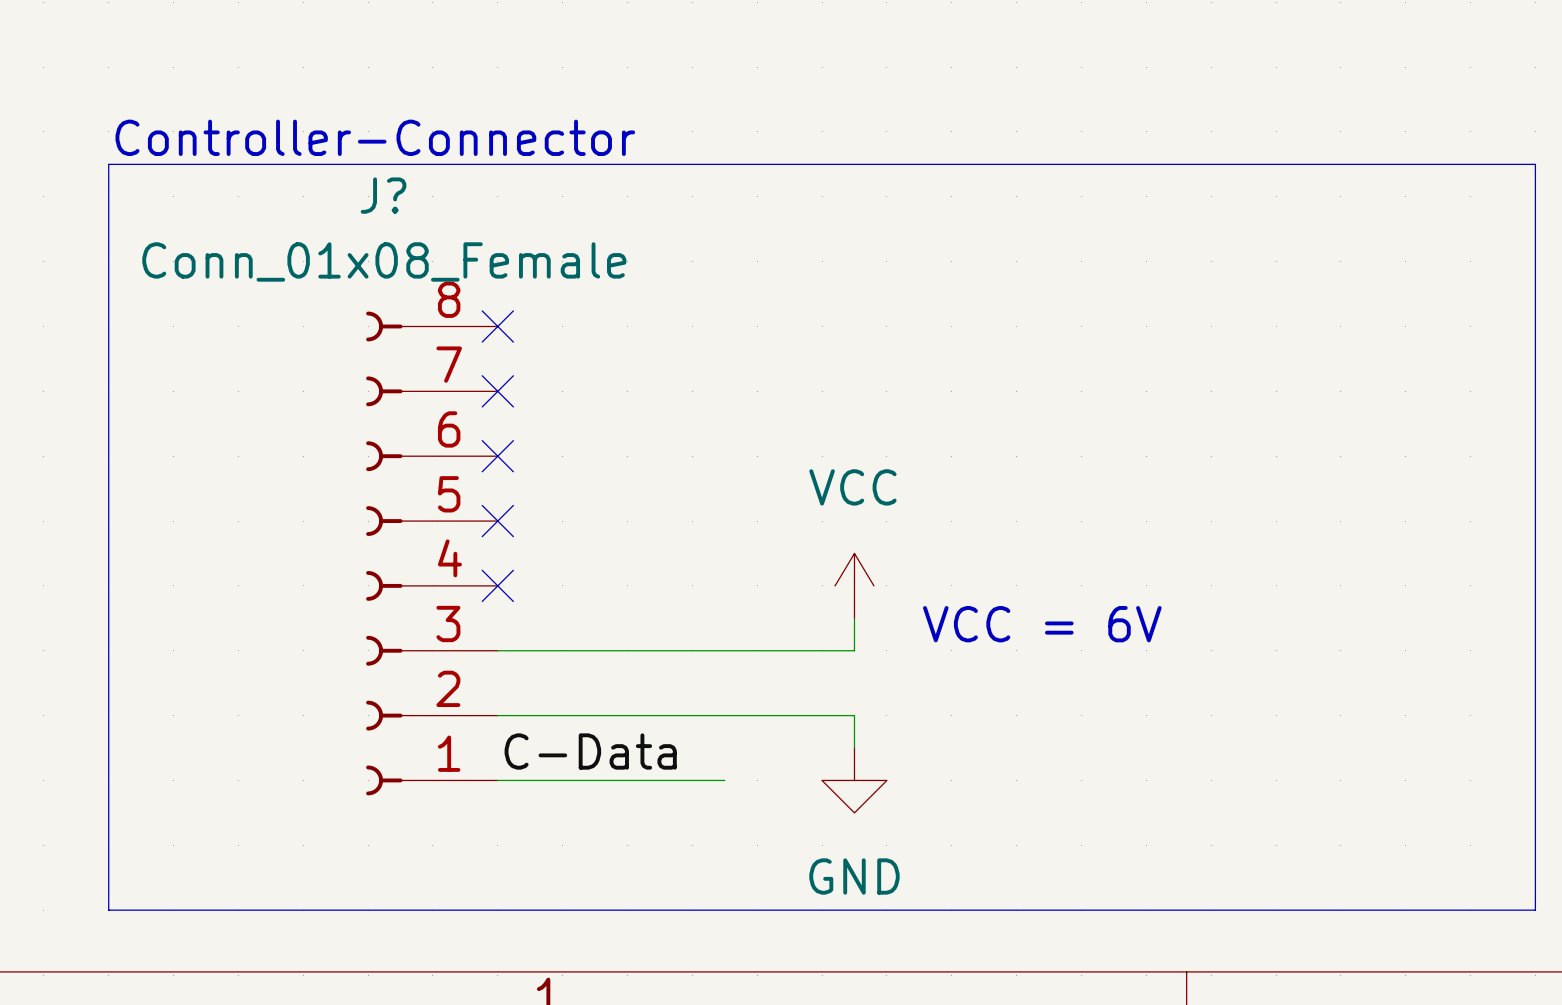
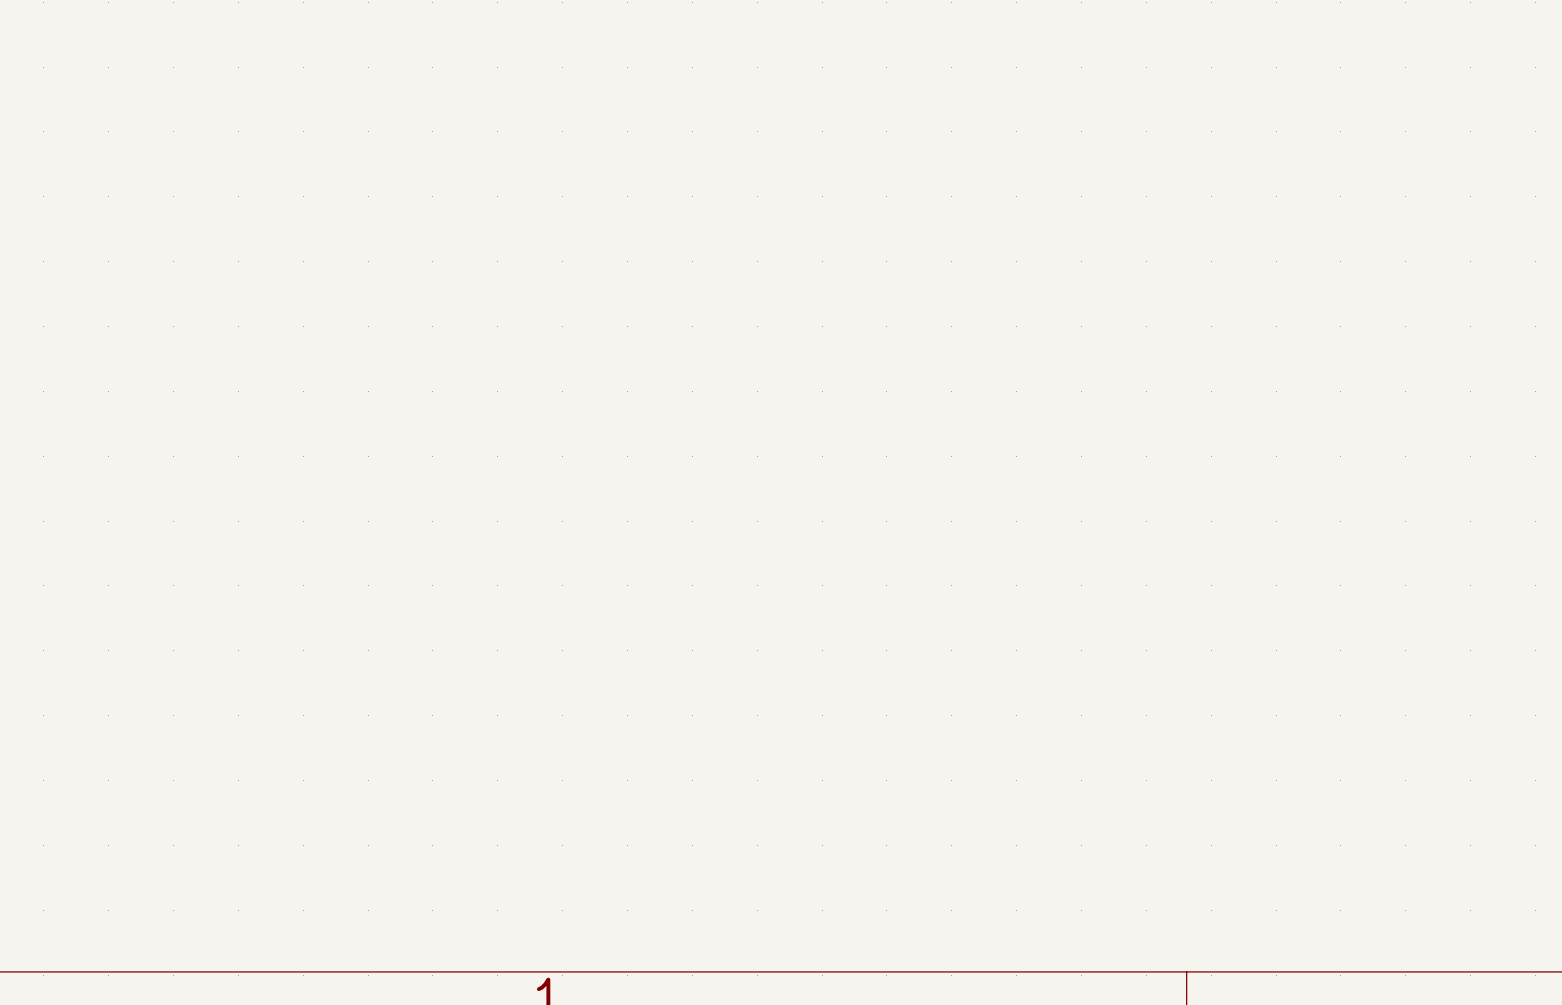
text: Controller-Connector (375, 137) -> none
line: (108, 164) (108, 910) (1535, 910) (1535, 164) (108, 164) -> none
no-connect mark: (497, 326) -> none
no-connect mark: (497, 391) -> none
no-connect mark: (497, 456) -> none
no-connect mark: (497, 521) -> none
J?: Conn_01x08_Female (431, 553) -> none
no-connect mark: (497, 585) -> none
power symbol: VCC (854, 585) -> none
wire: (854, 618) (854, 650) (497, 650) -> none
text: VCC = 6V (1042, 624) -> none
wire: (497, 715) (854, 715) (854, 748) -> none
label: C-Data (590, 751) -> none
wire: (497, 780) (724, 780) -> none
power symbol: GND (854, 780) -> none

